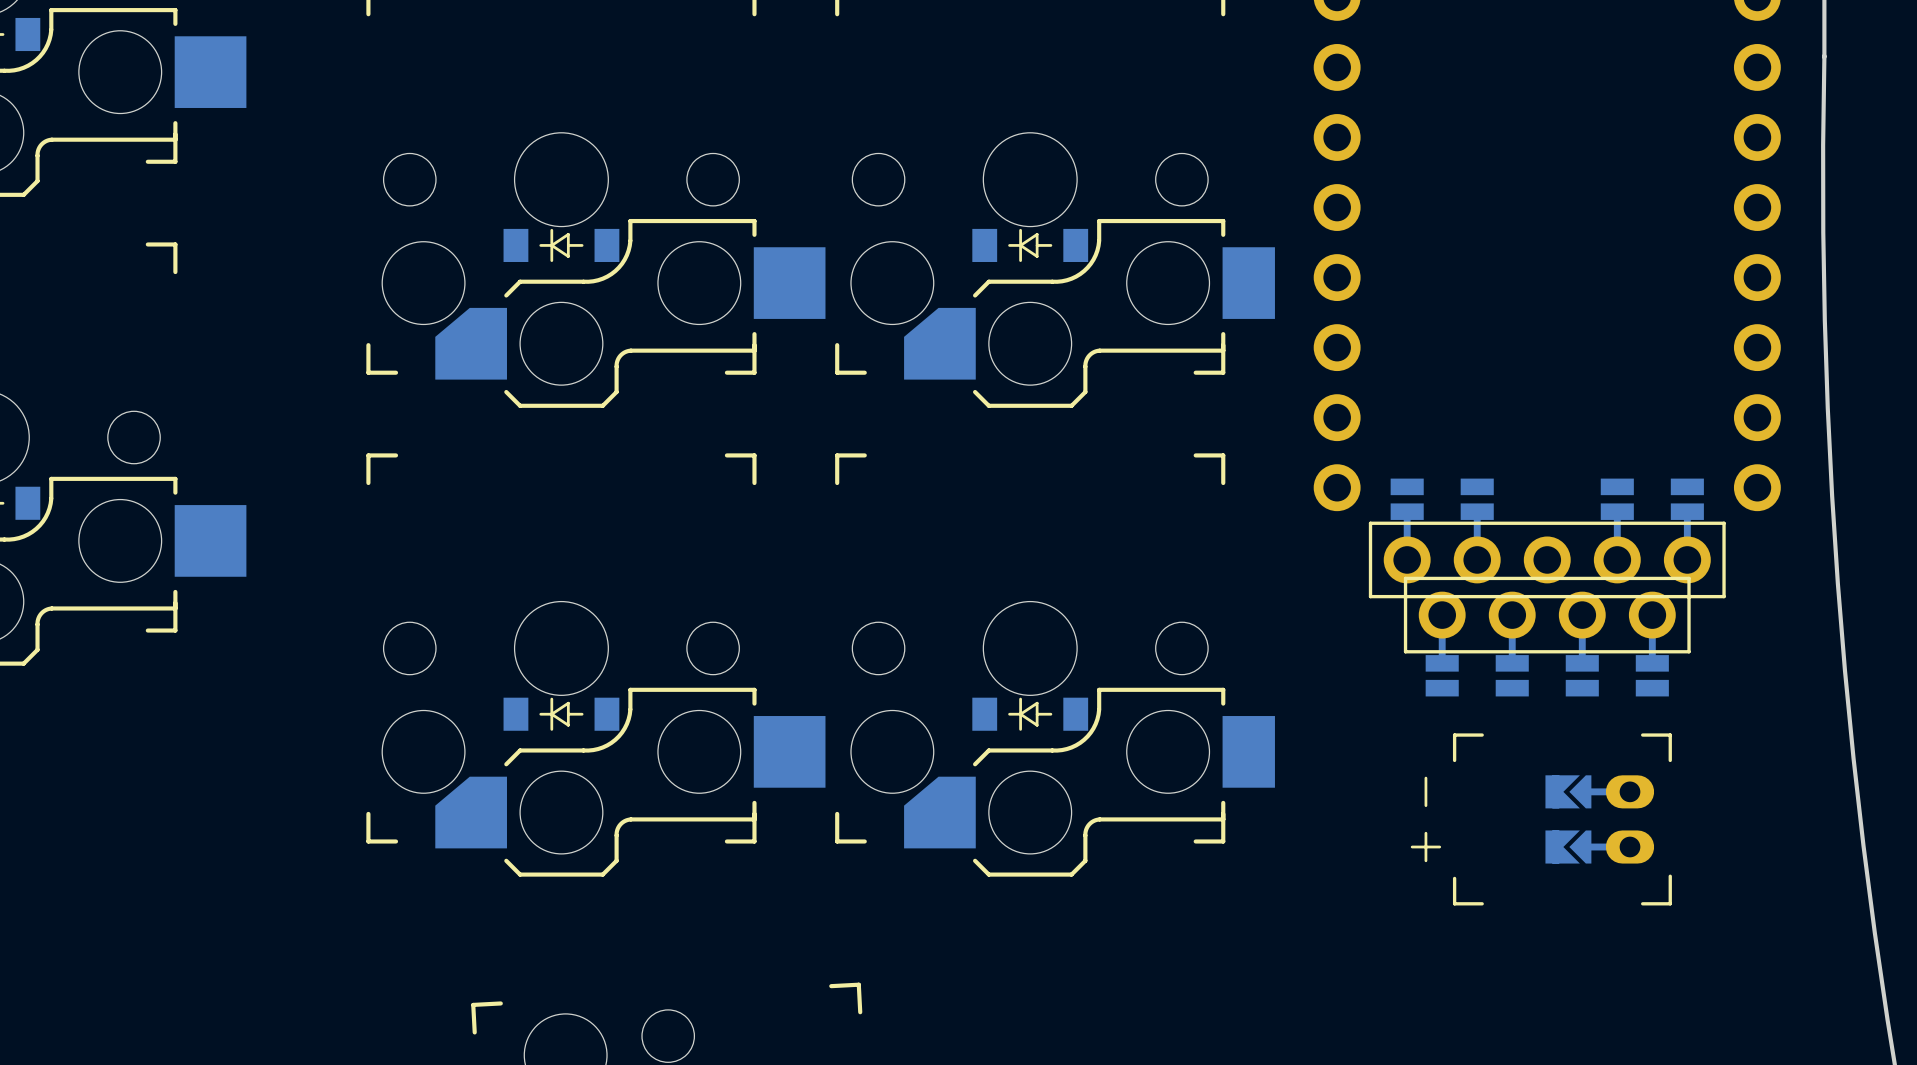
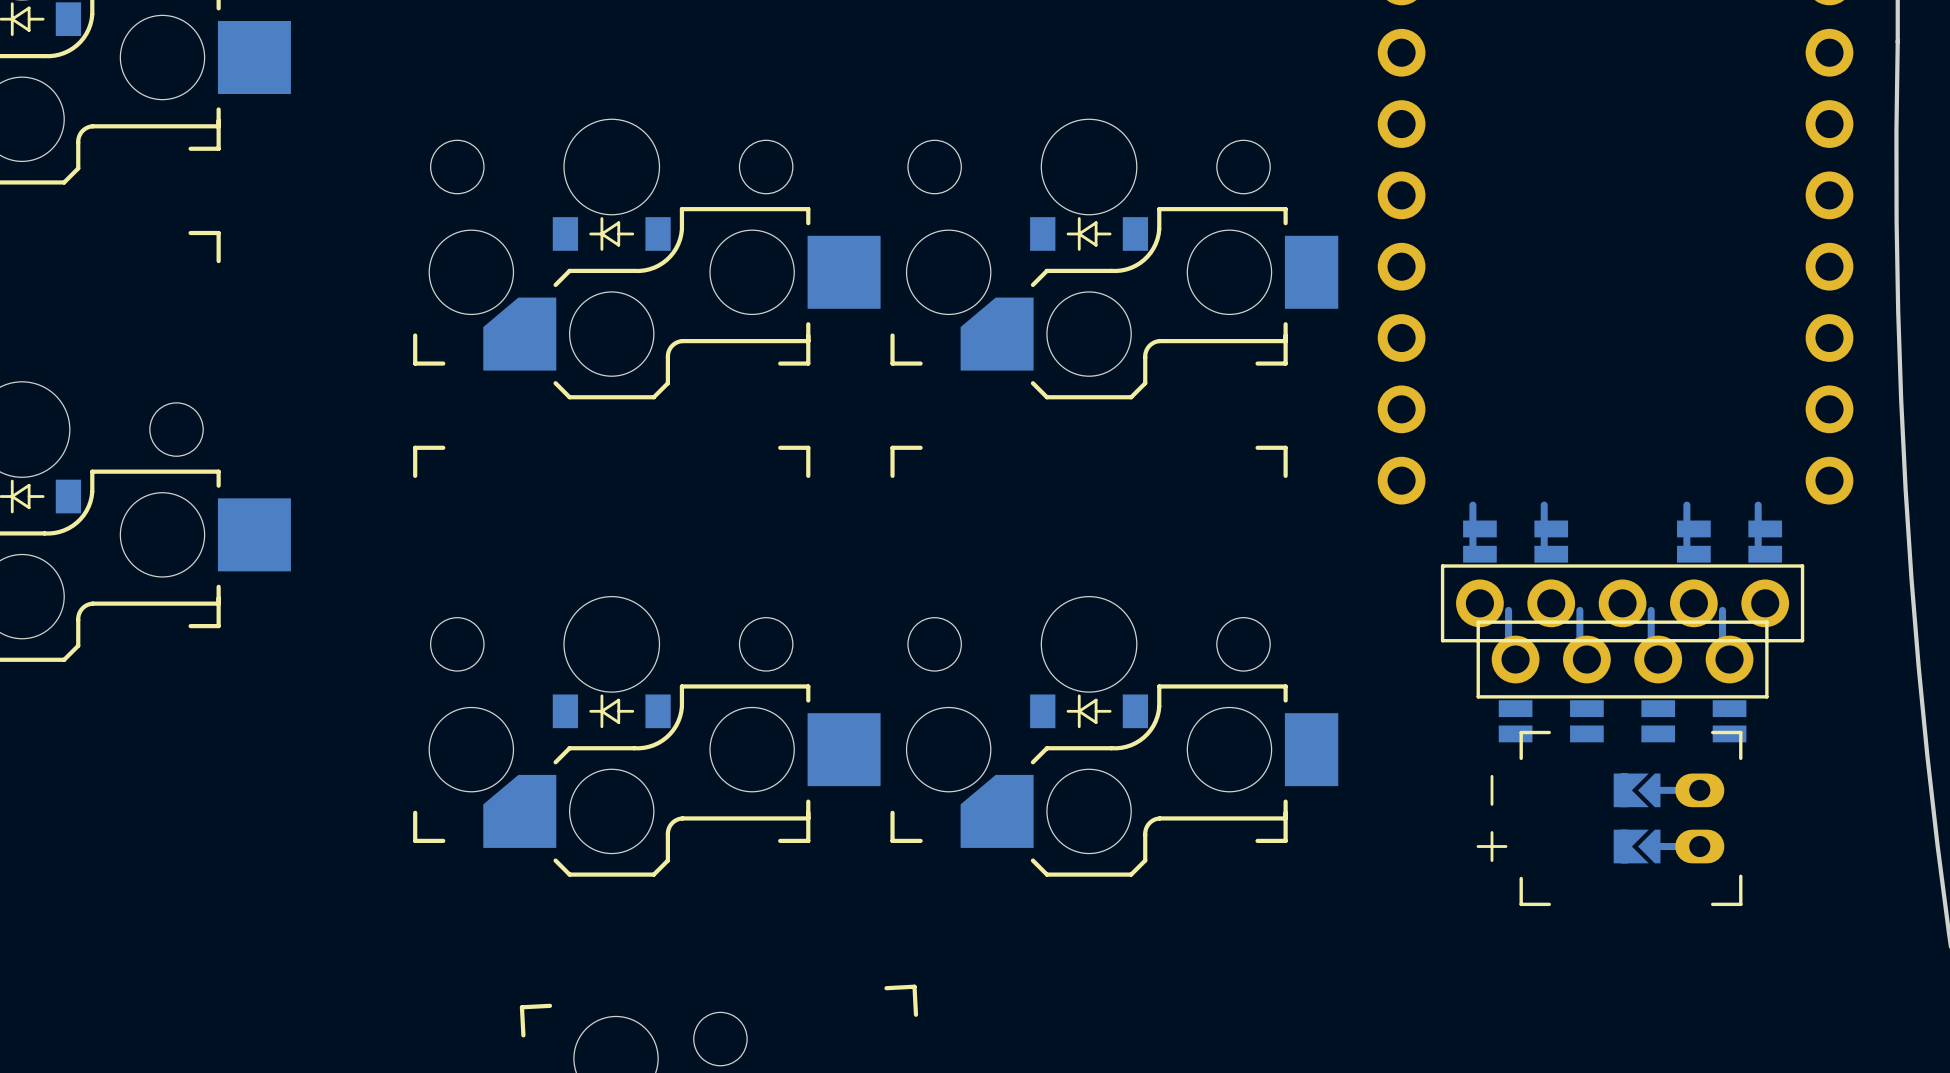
part position: (1547, 538) -> (1622, 581)
part position: (1547, 636) -> (1622, 681)

